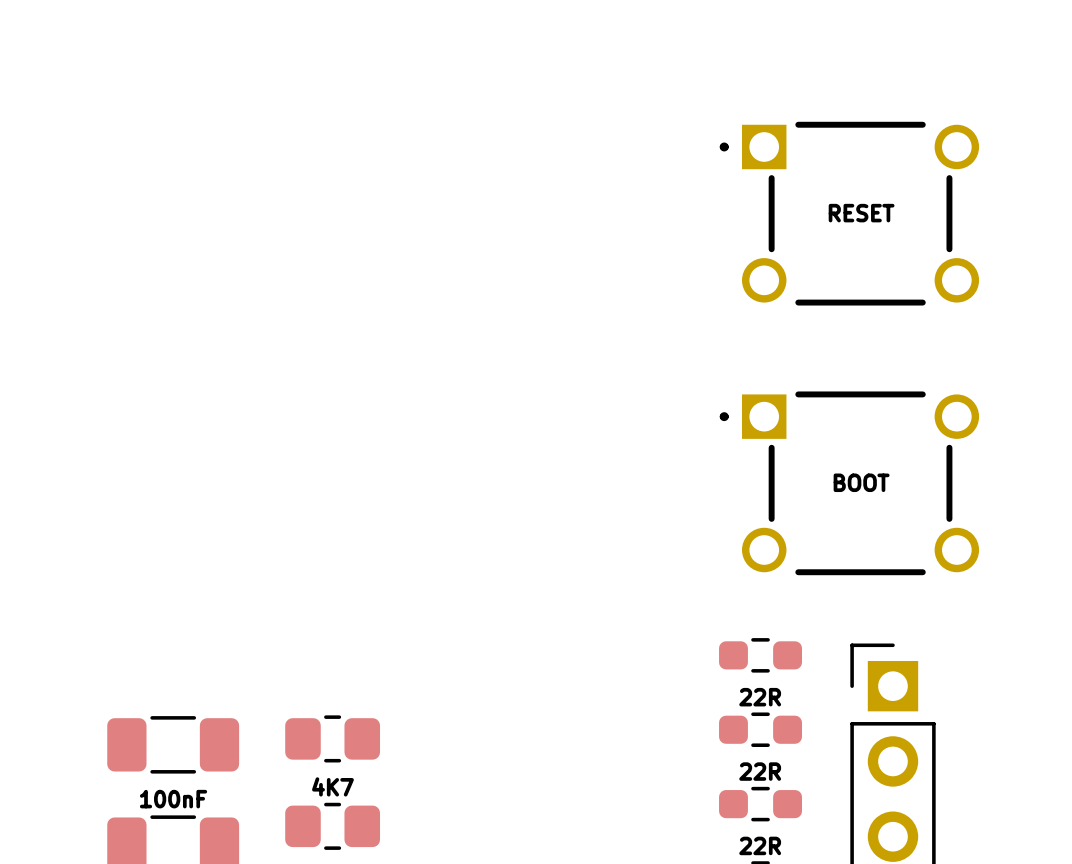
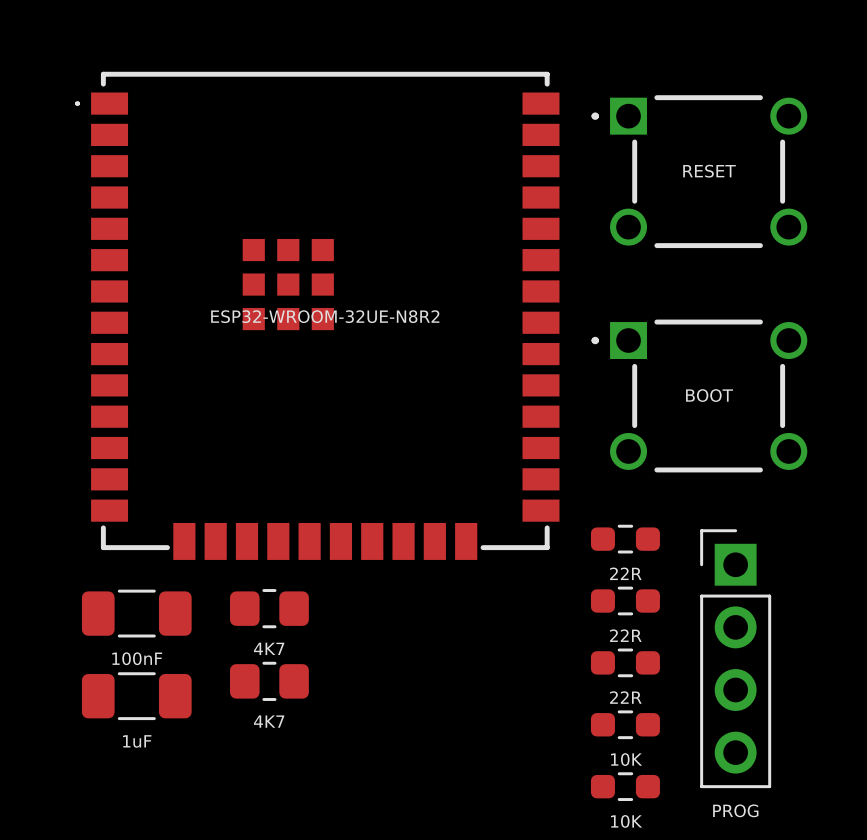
part: none -> ESP32-WROOM-32UE-N8R2 (317, 315)

